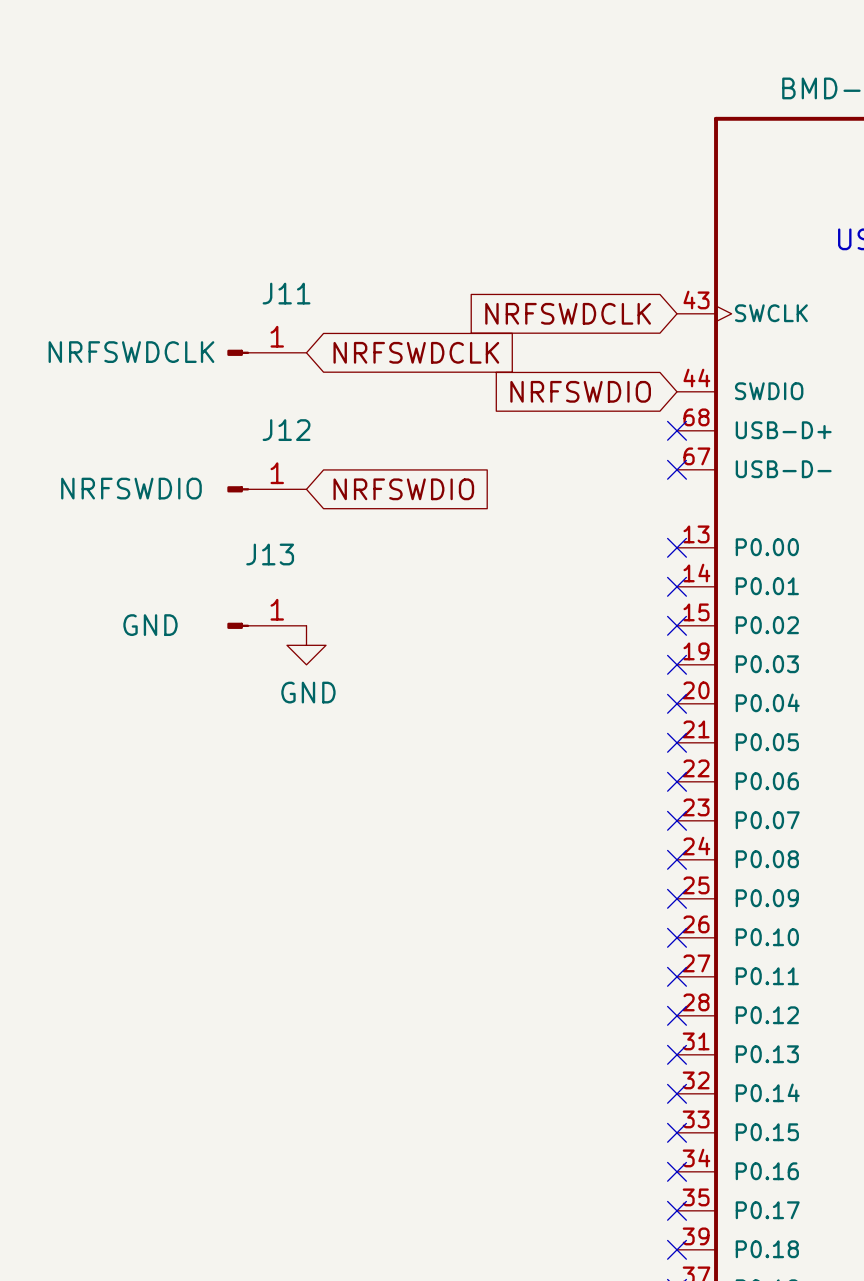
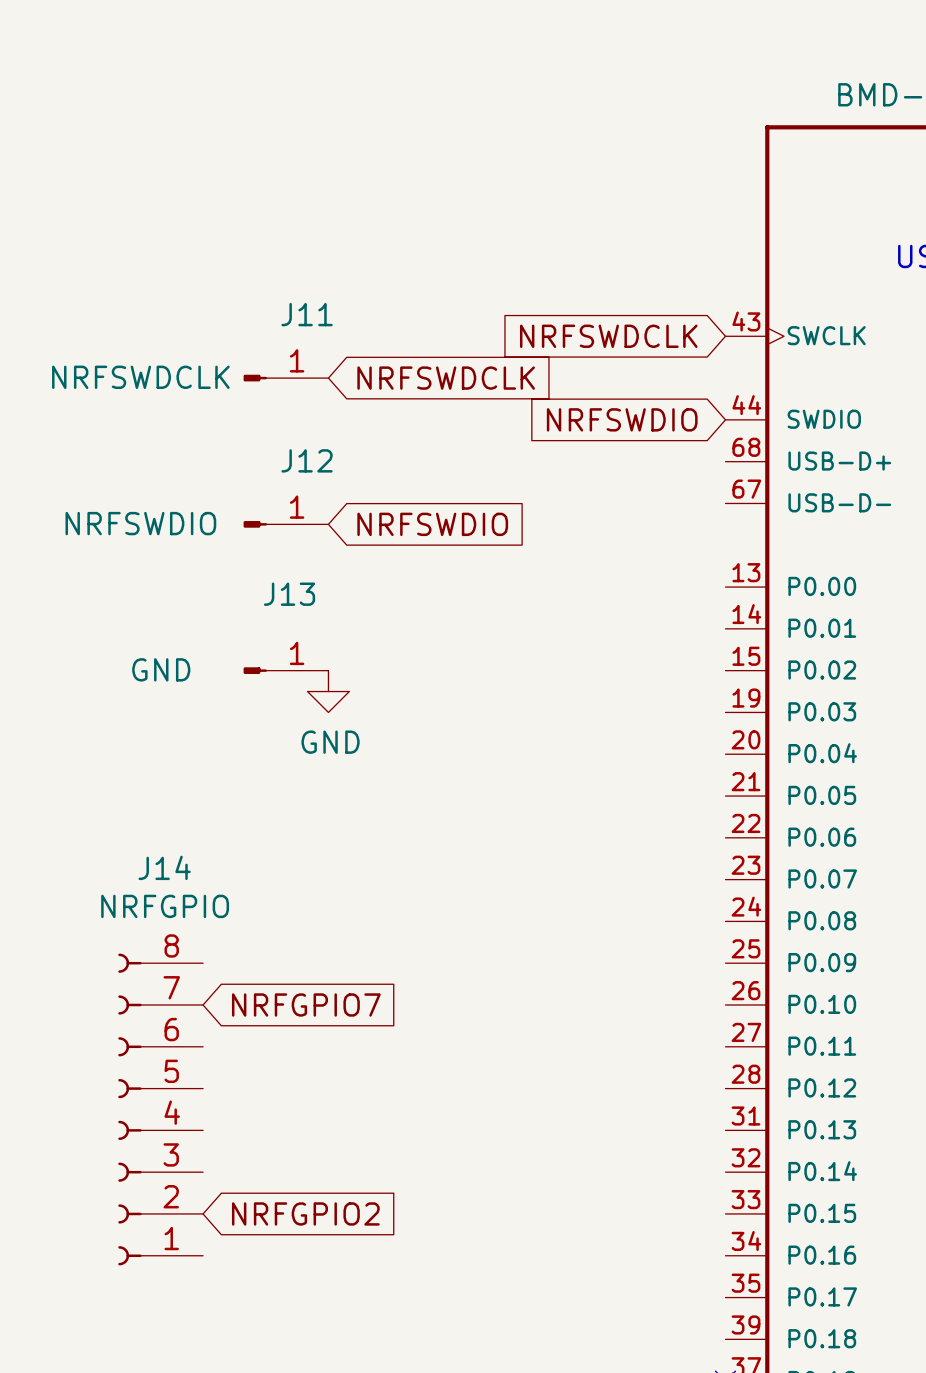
no-connect mark: (677, 430) -> none
no-connect mark: (677, 469) -> none
no-connect mark: (677, 547) -> none
no-connect mark: (677, 586) -> none
no-connect mark: (677, 625) -> none
no-connect mark: (677, 664) -> none
no-connect mark: (677, 703) -> none
no-connect mark: (677, 742) -> none
no-connect mark: (677, 781) -> none
no-connect mark: (677, 820) -> none
no-connect mark: (677, 859) -> none
no-connect mark: (677, 898) -> none
global label: none -> NRFGPIO7 (306, 1005)
no-connect mark: (677, 937) -> none
no-connect mark: (677, 976) -> none
no-connect mark: (677, 1015) -> none
J14: none -> NRFGPIO (160, 1109)
no-connect mark: (677, 1054) -> none
no-connect mark: (677, 1093) -> none
global label: none -> NRFGPIO2 (305, 1213)
no-connect mark: (677, 1132) -> none
no-connect mark: (677, 1171) -> none
no-connect mark: (677, 1210) -> none
no-connect mark: (677, 1249) -> none

